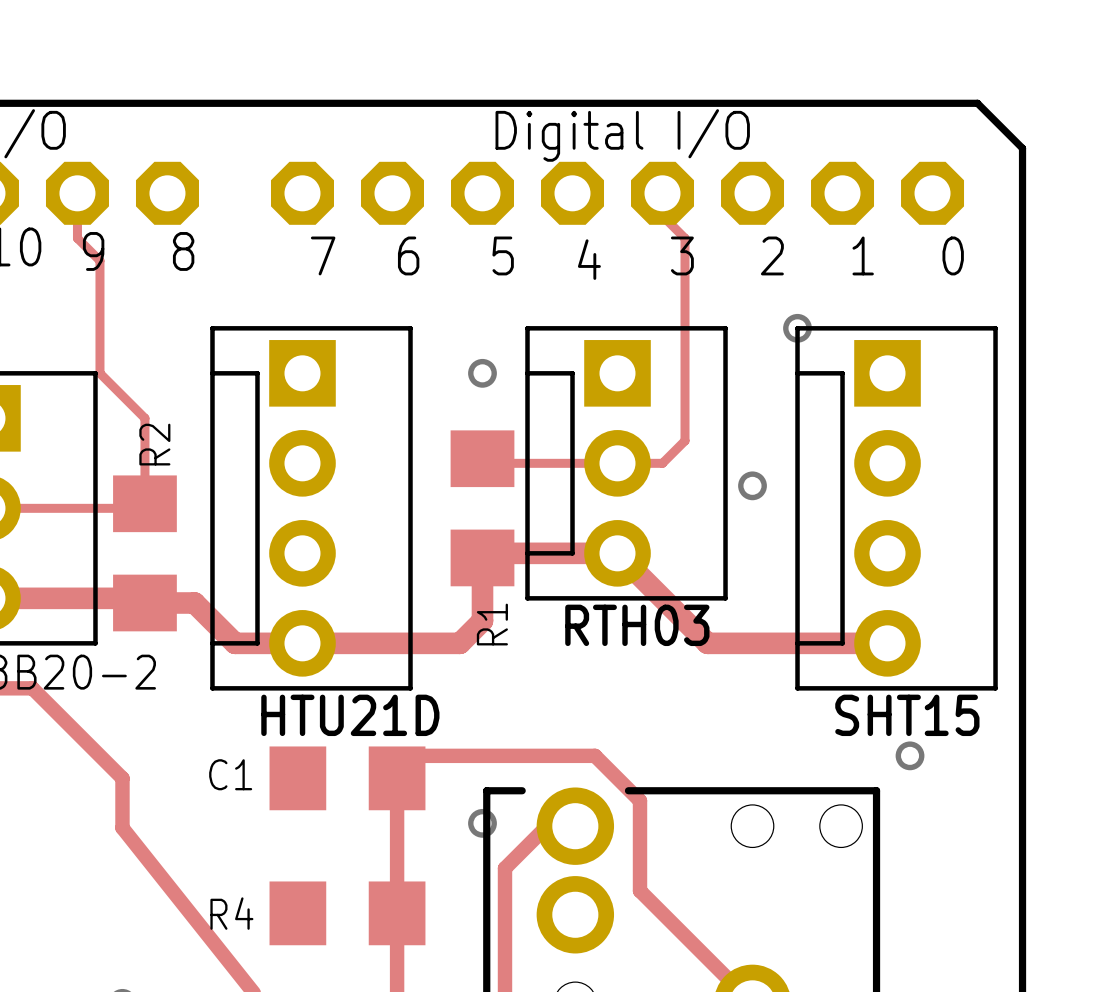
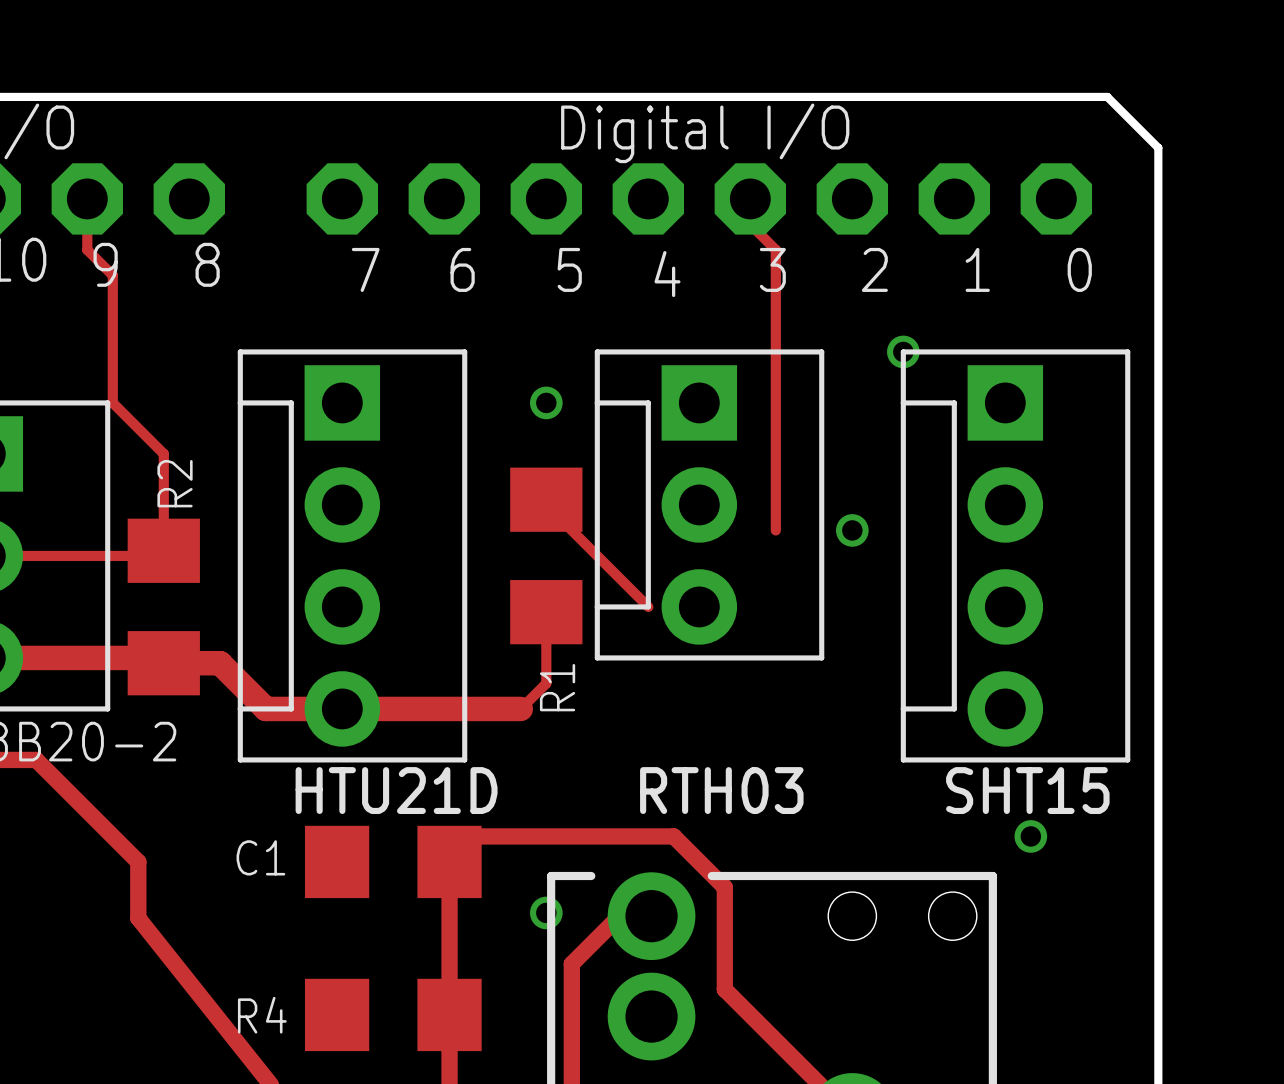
track: (685, 440) (662, 463) (482, 463) -> (648, 606) (546, 504)
track: none -> (775, 479) (775, 530)
track width: thick (482, 557) (482, 620) (459, 643) -> thin (546, 612) (546, 683) (520, 708)
track: (509, 557) (482, 557) (487, 553) (617, 553) (707, 643) (887, 643) -> none
text position: RTH03 (637, 625) -> RTH03 (721, 790)

